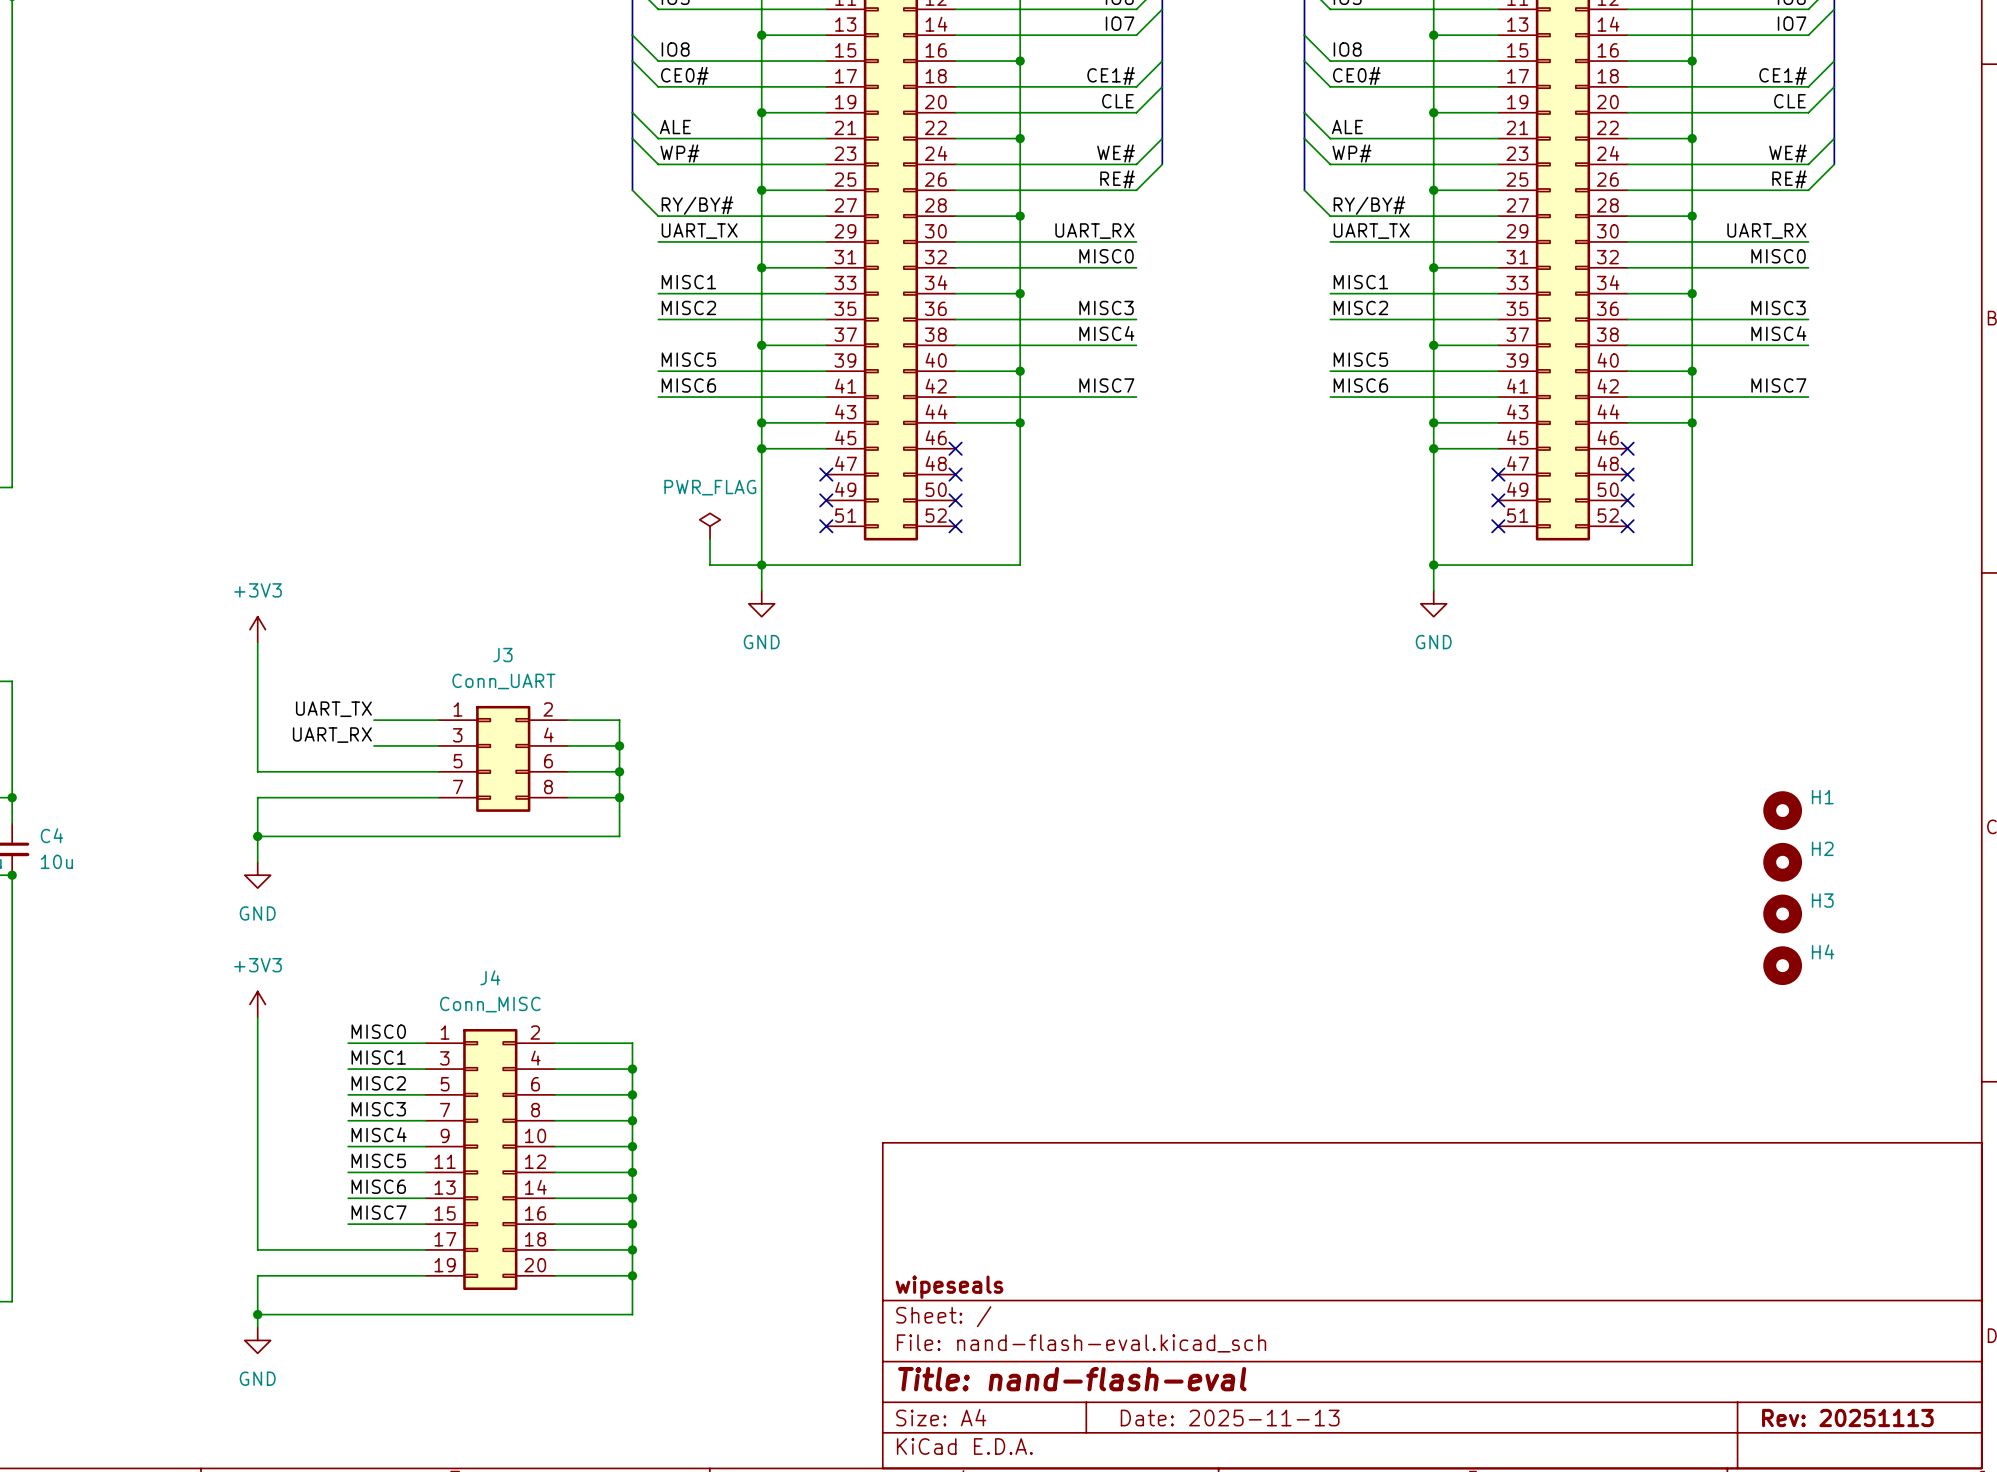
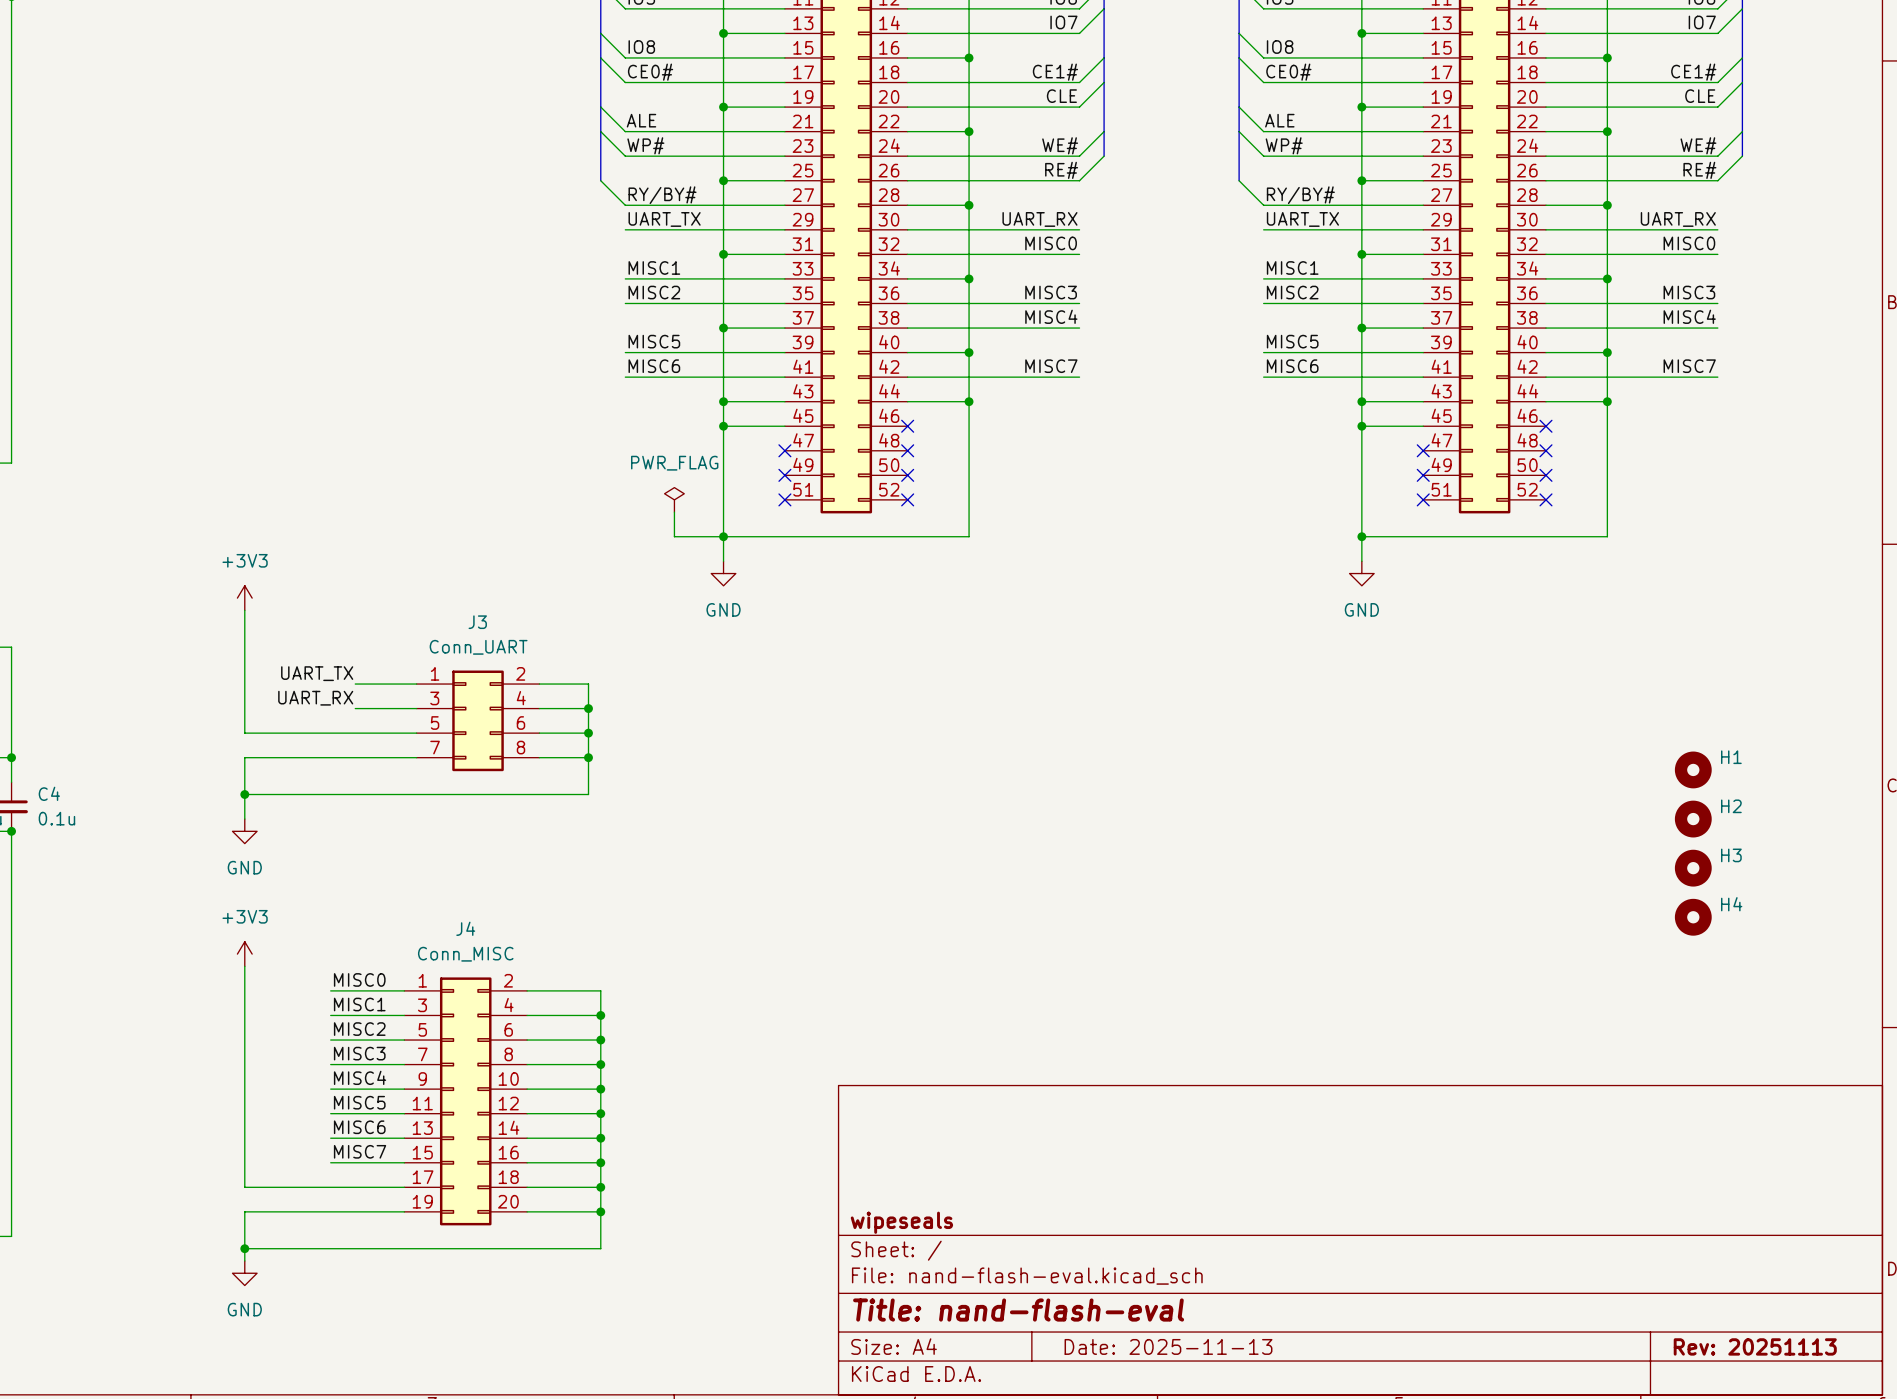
C4 value: 10u (56, 861) -> 0.1u (56, 818)

